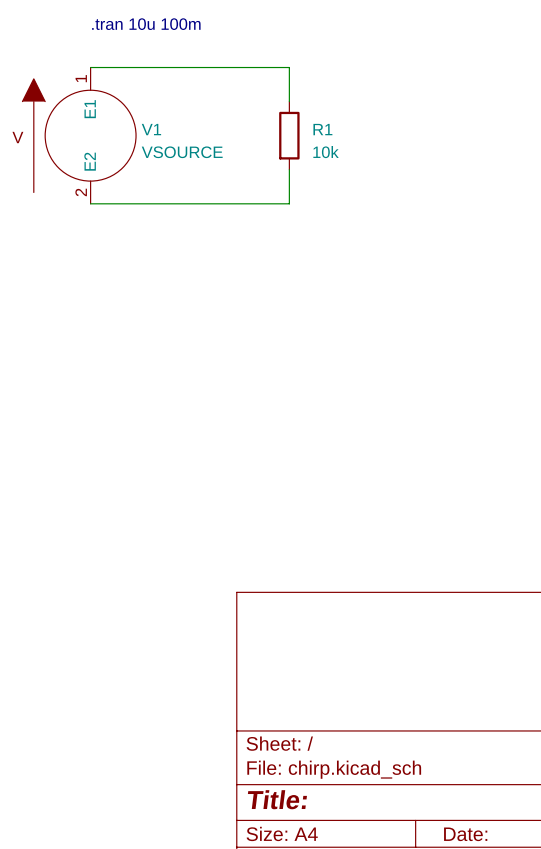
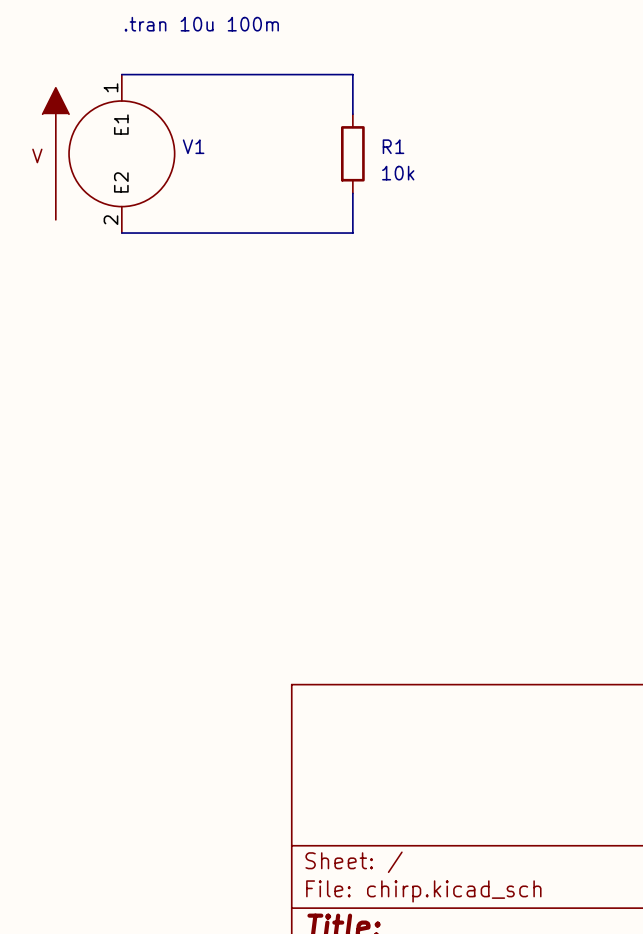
V1 value: VSOURCE (182, 152) -> none

